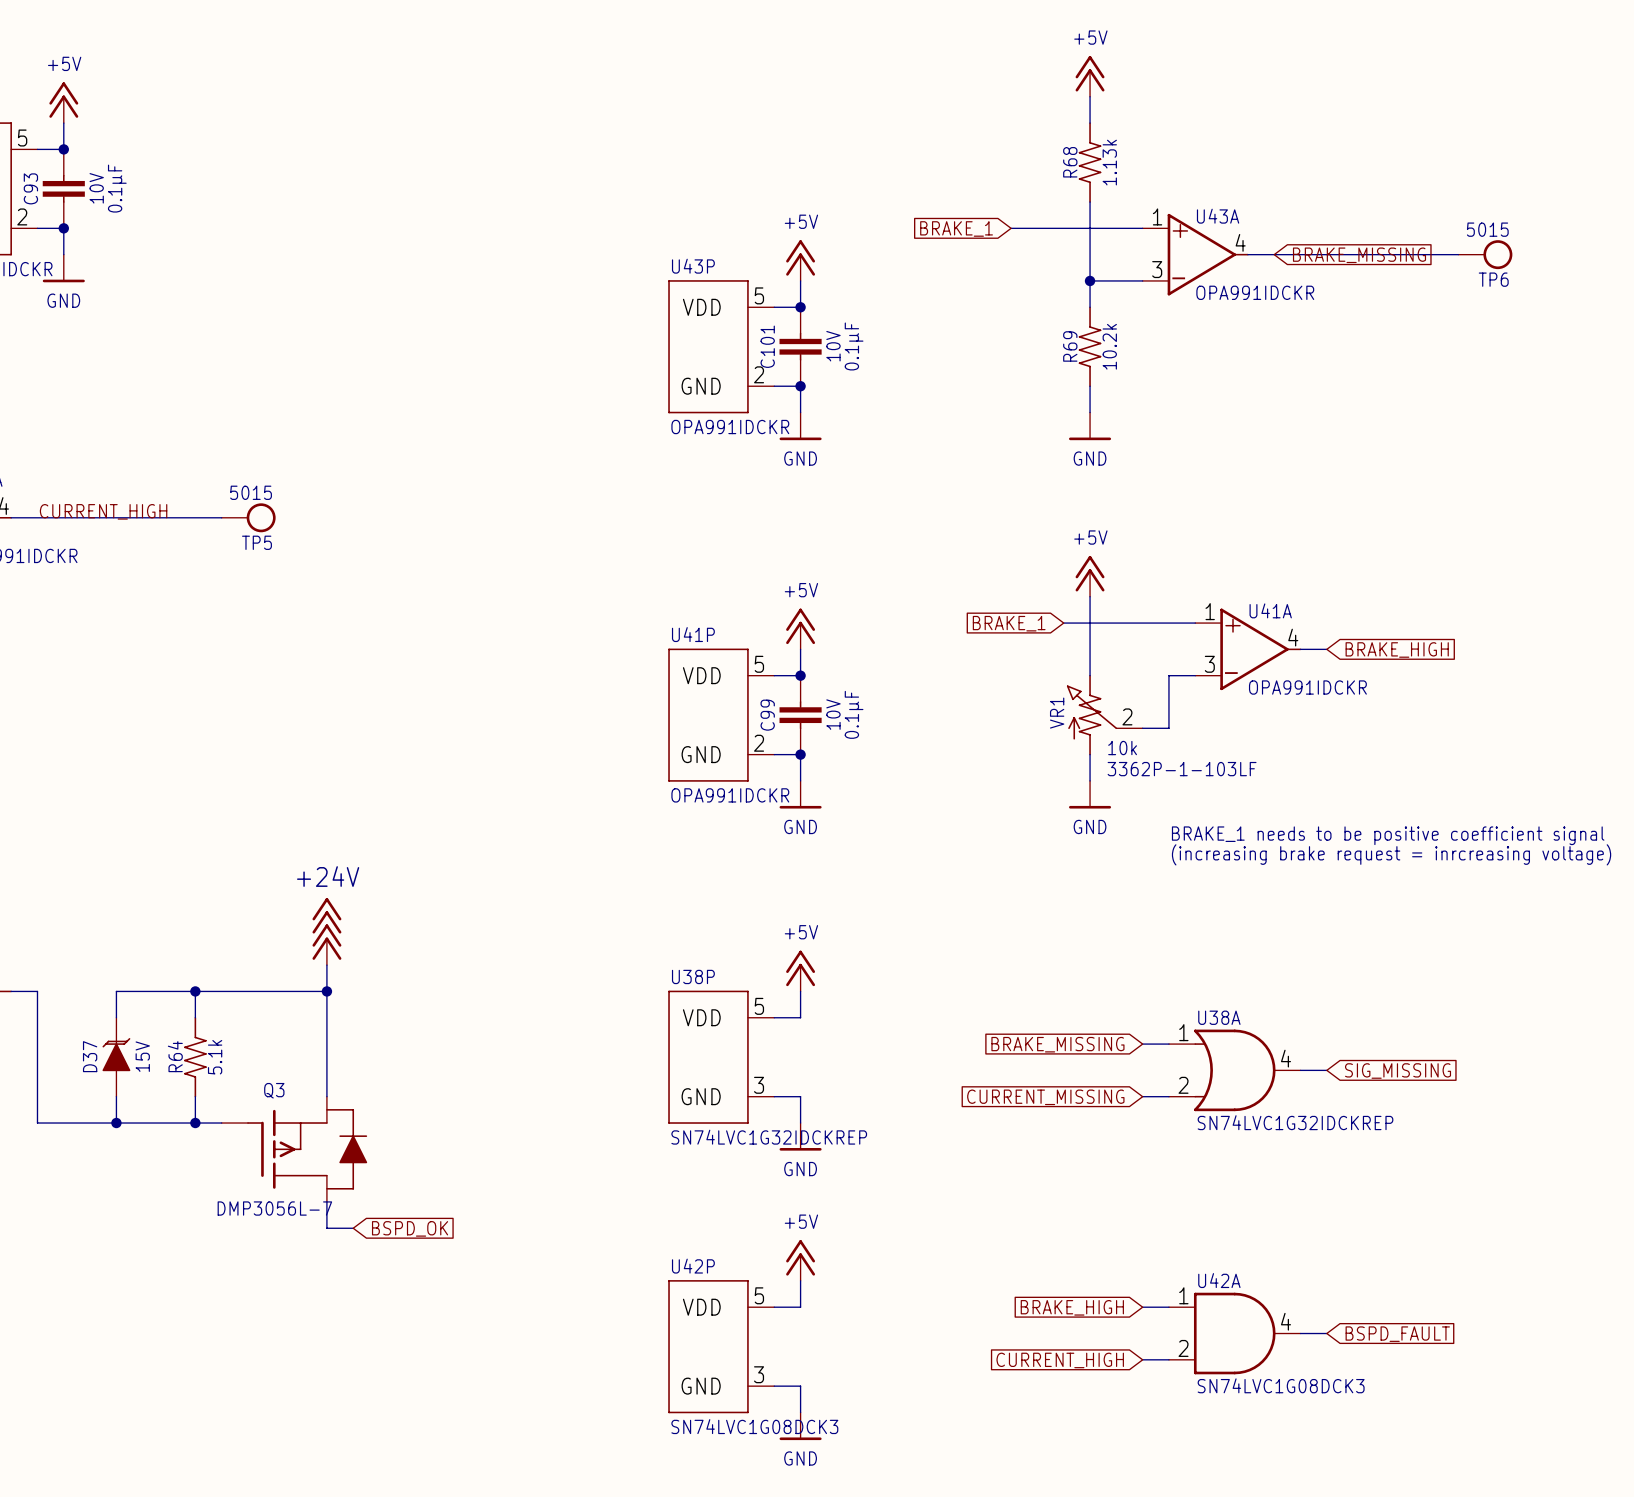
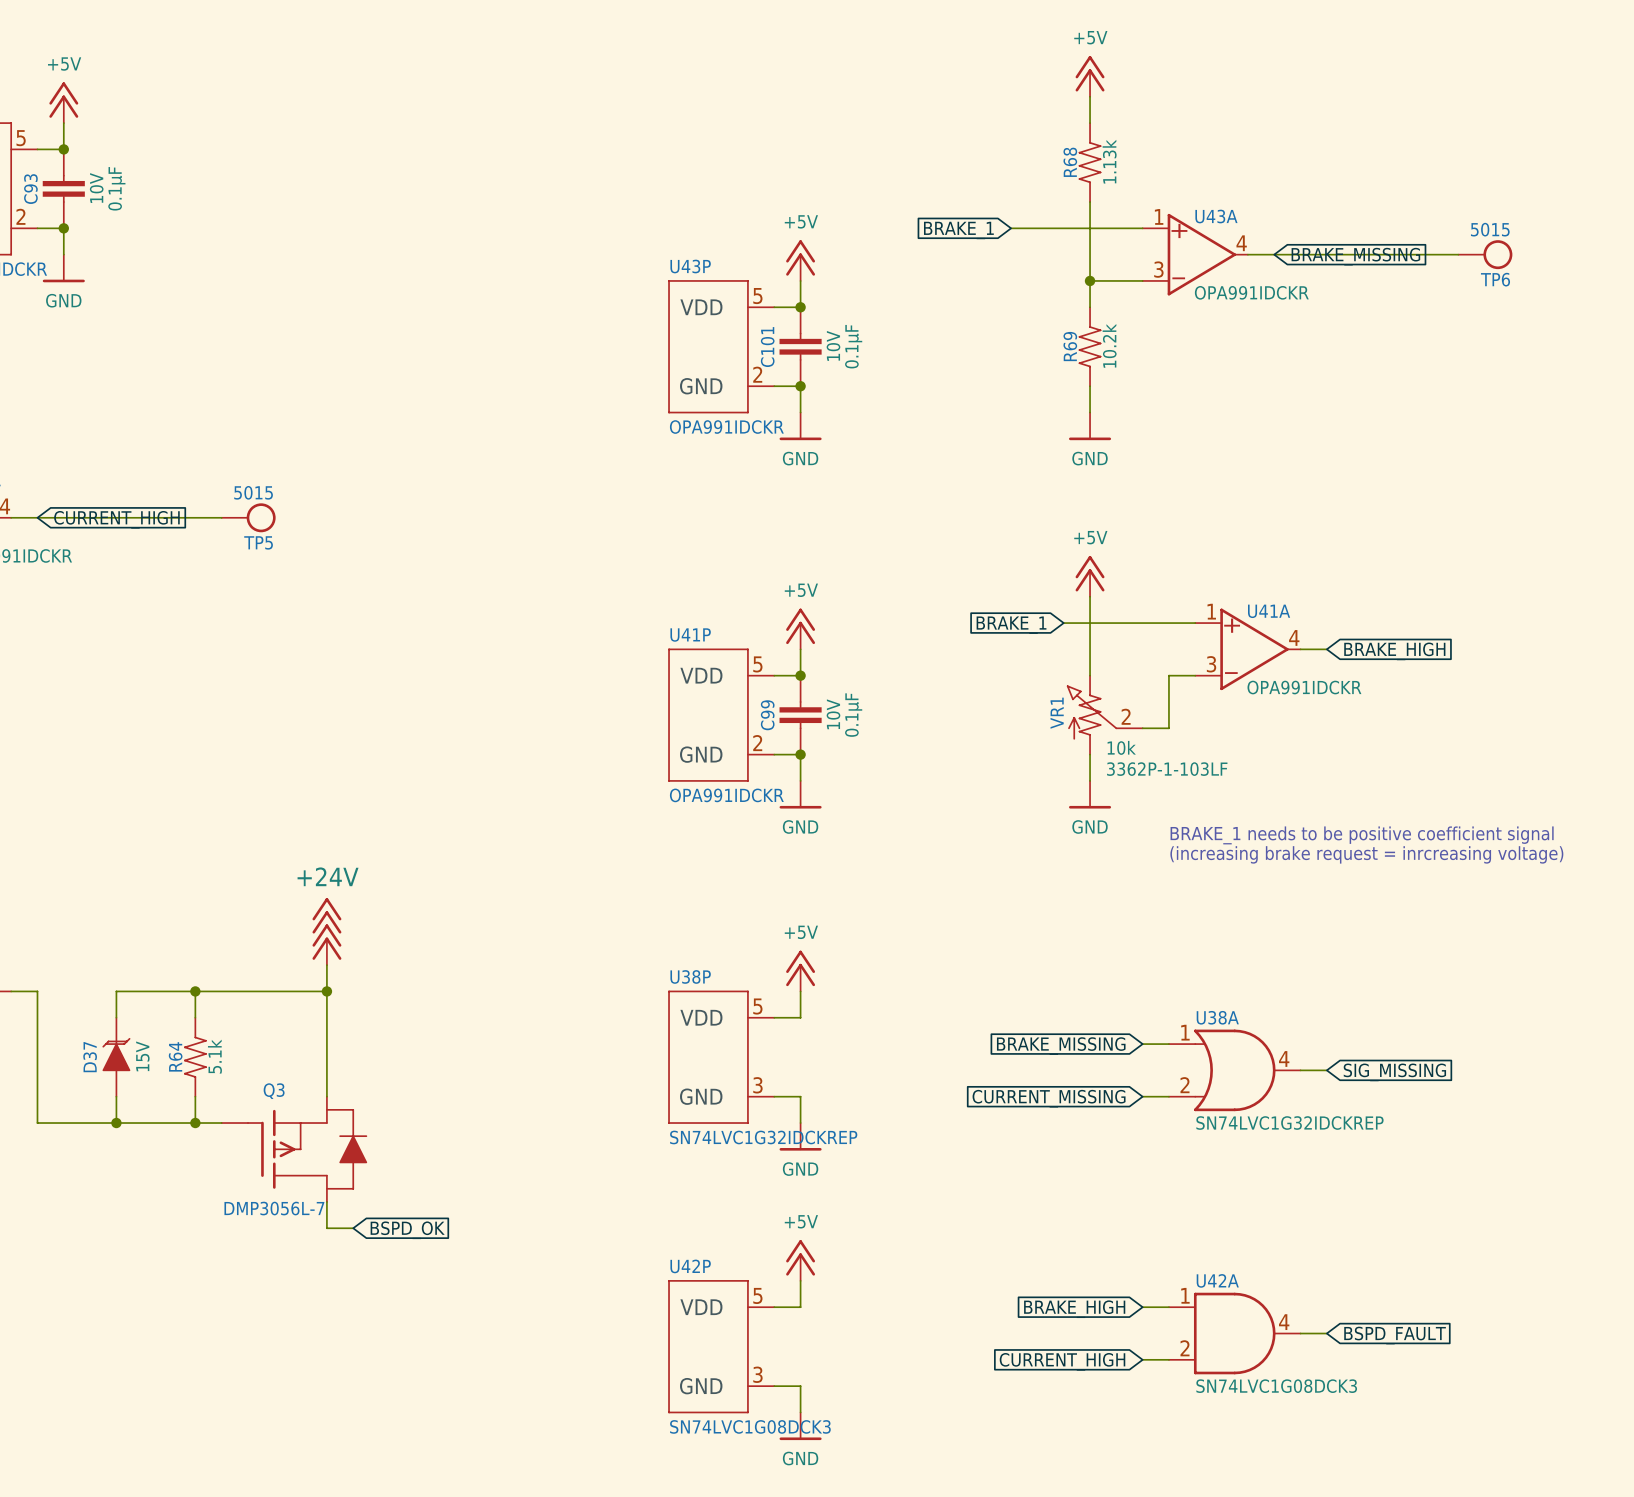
label: CURRENT_HIGH (103, 511) -> none
global label: none -> CURRENT_HIGH (116, 519)

